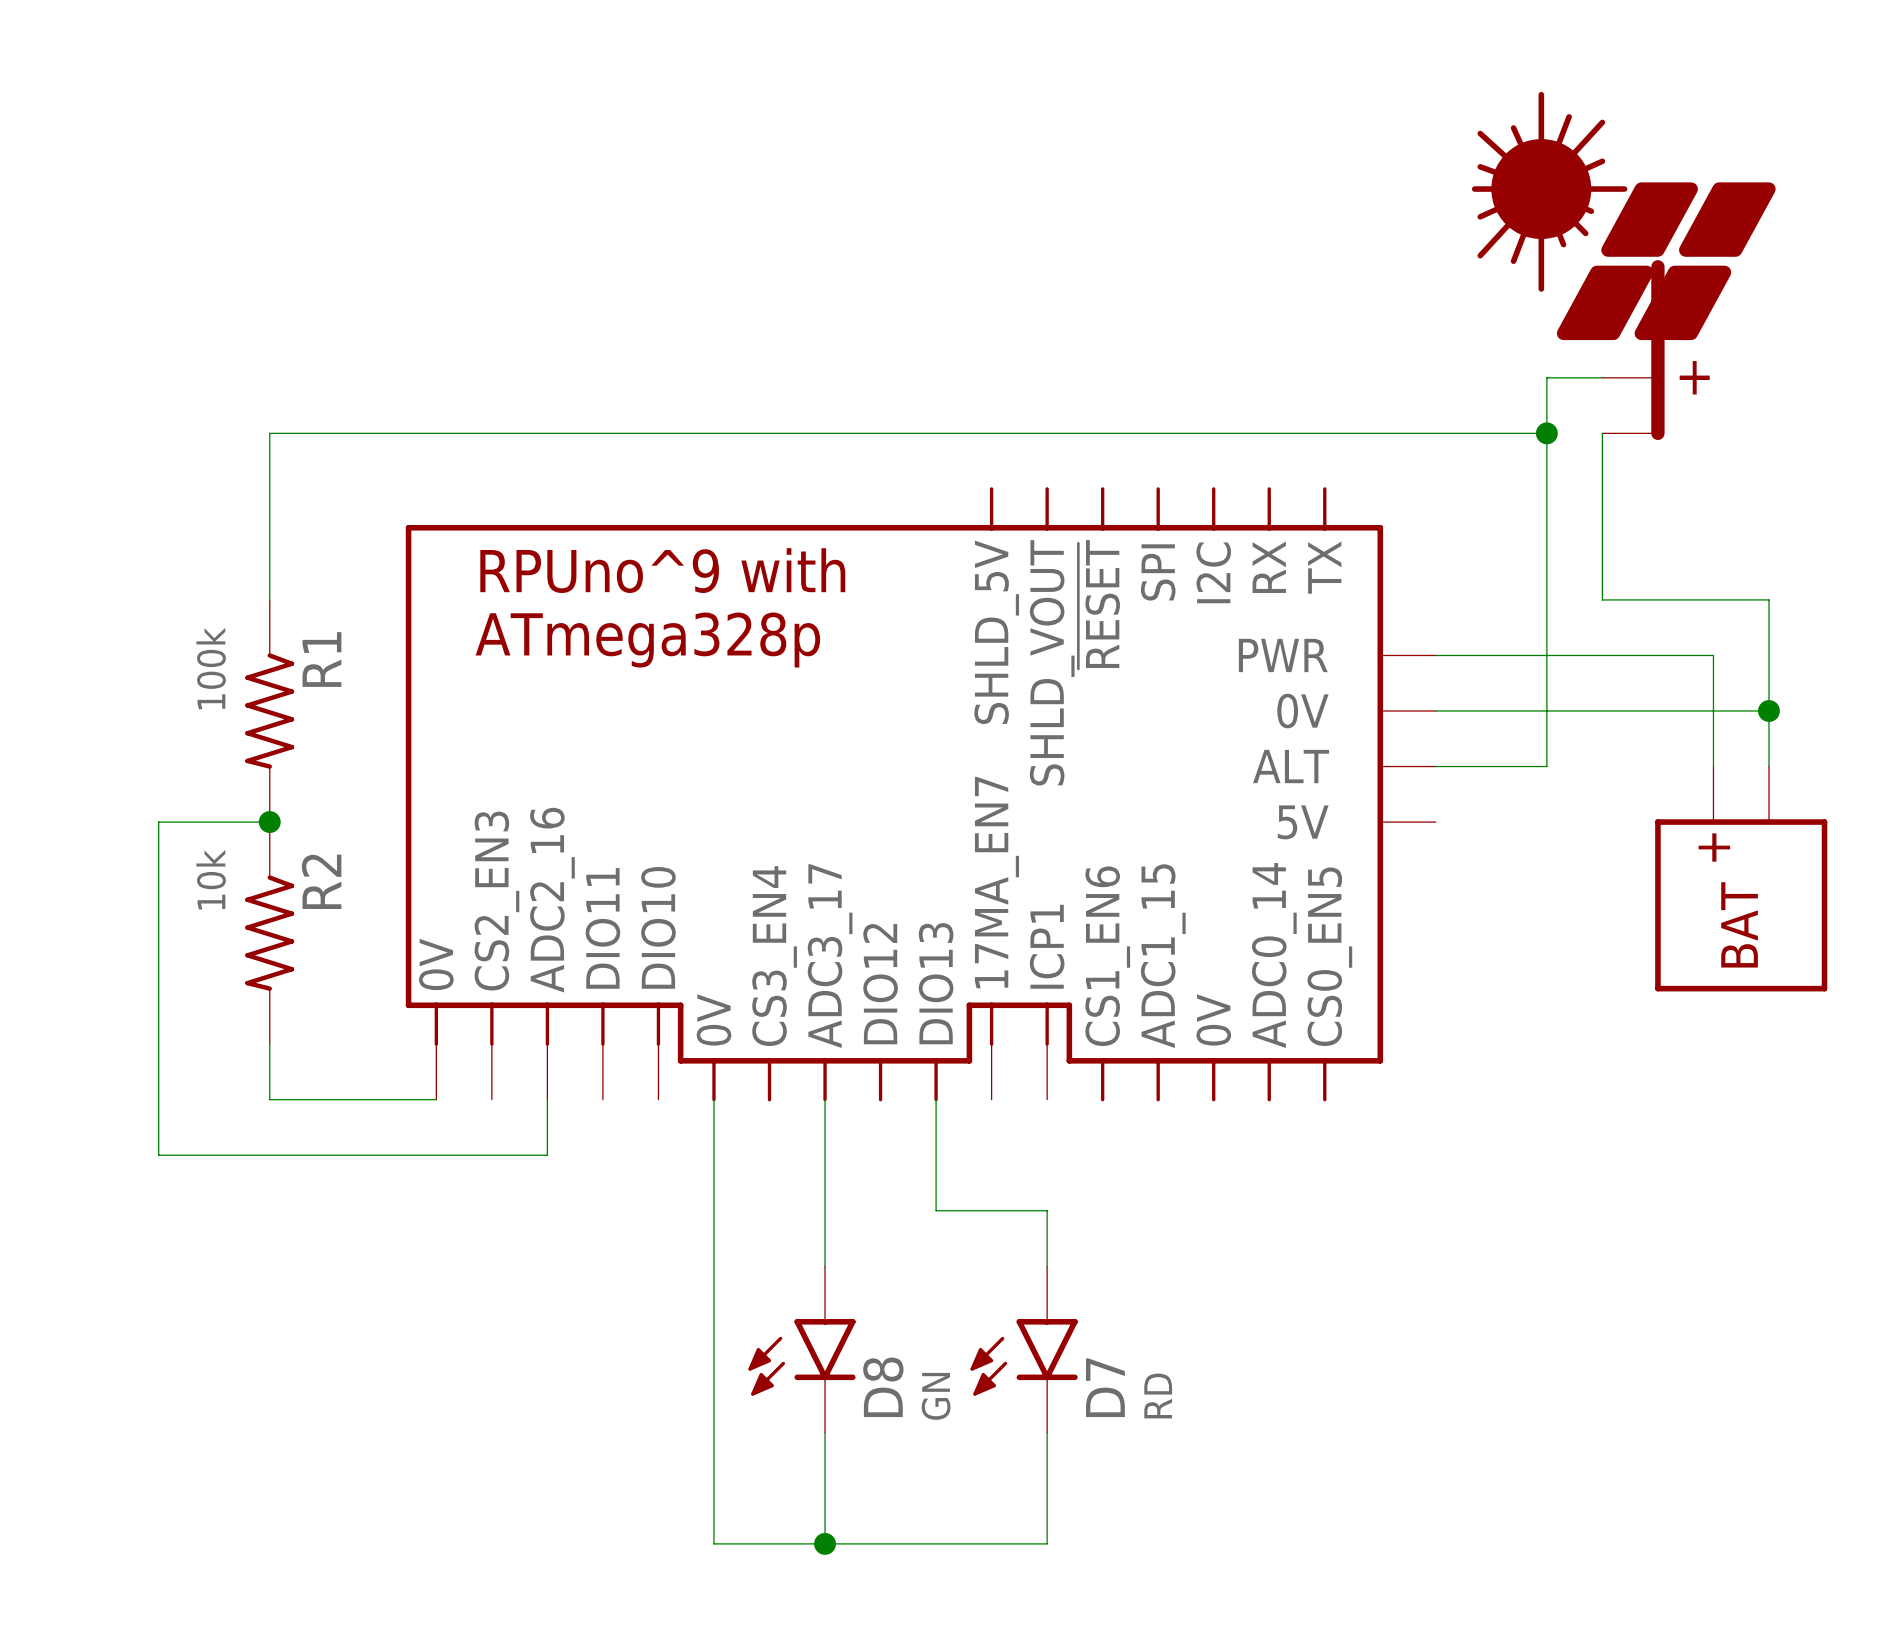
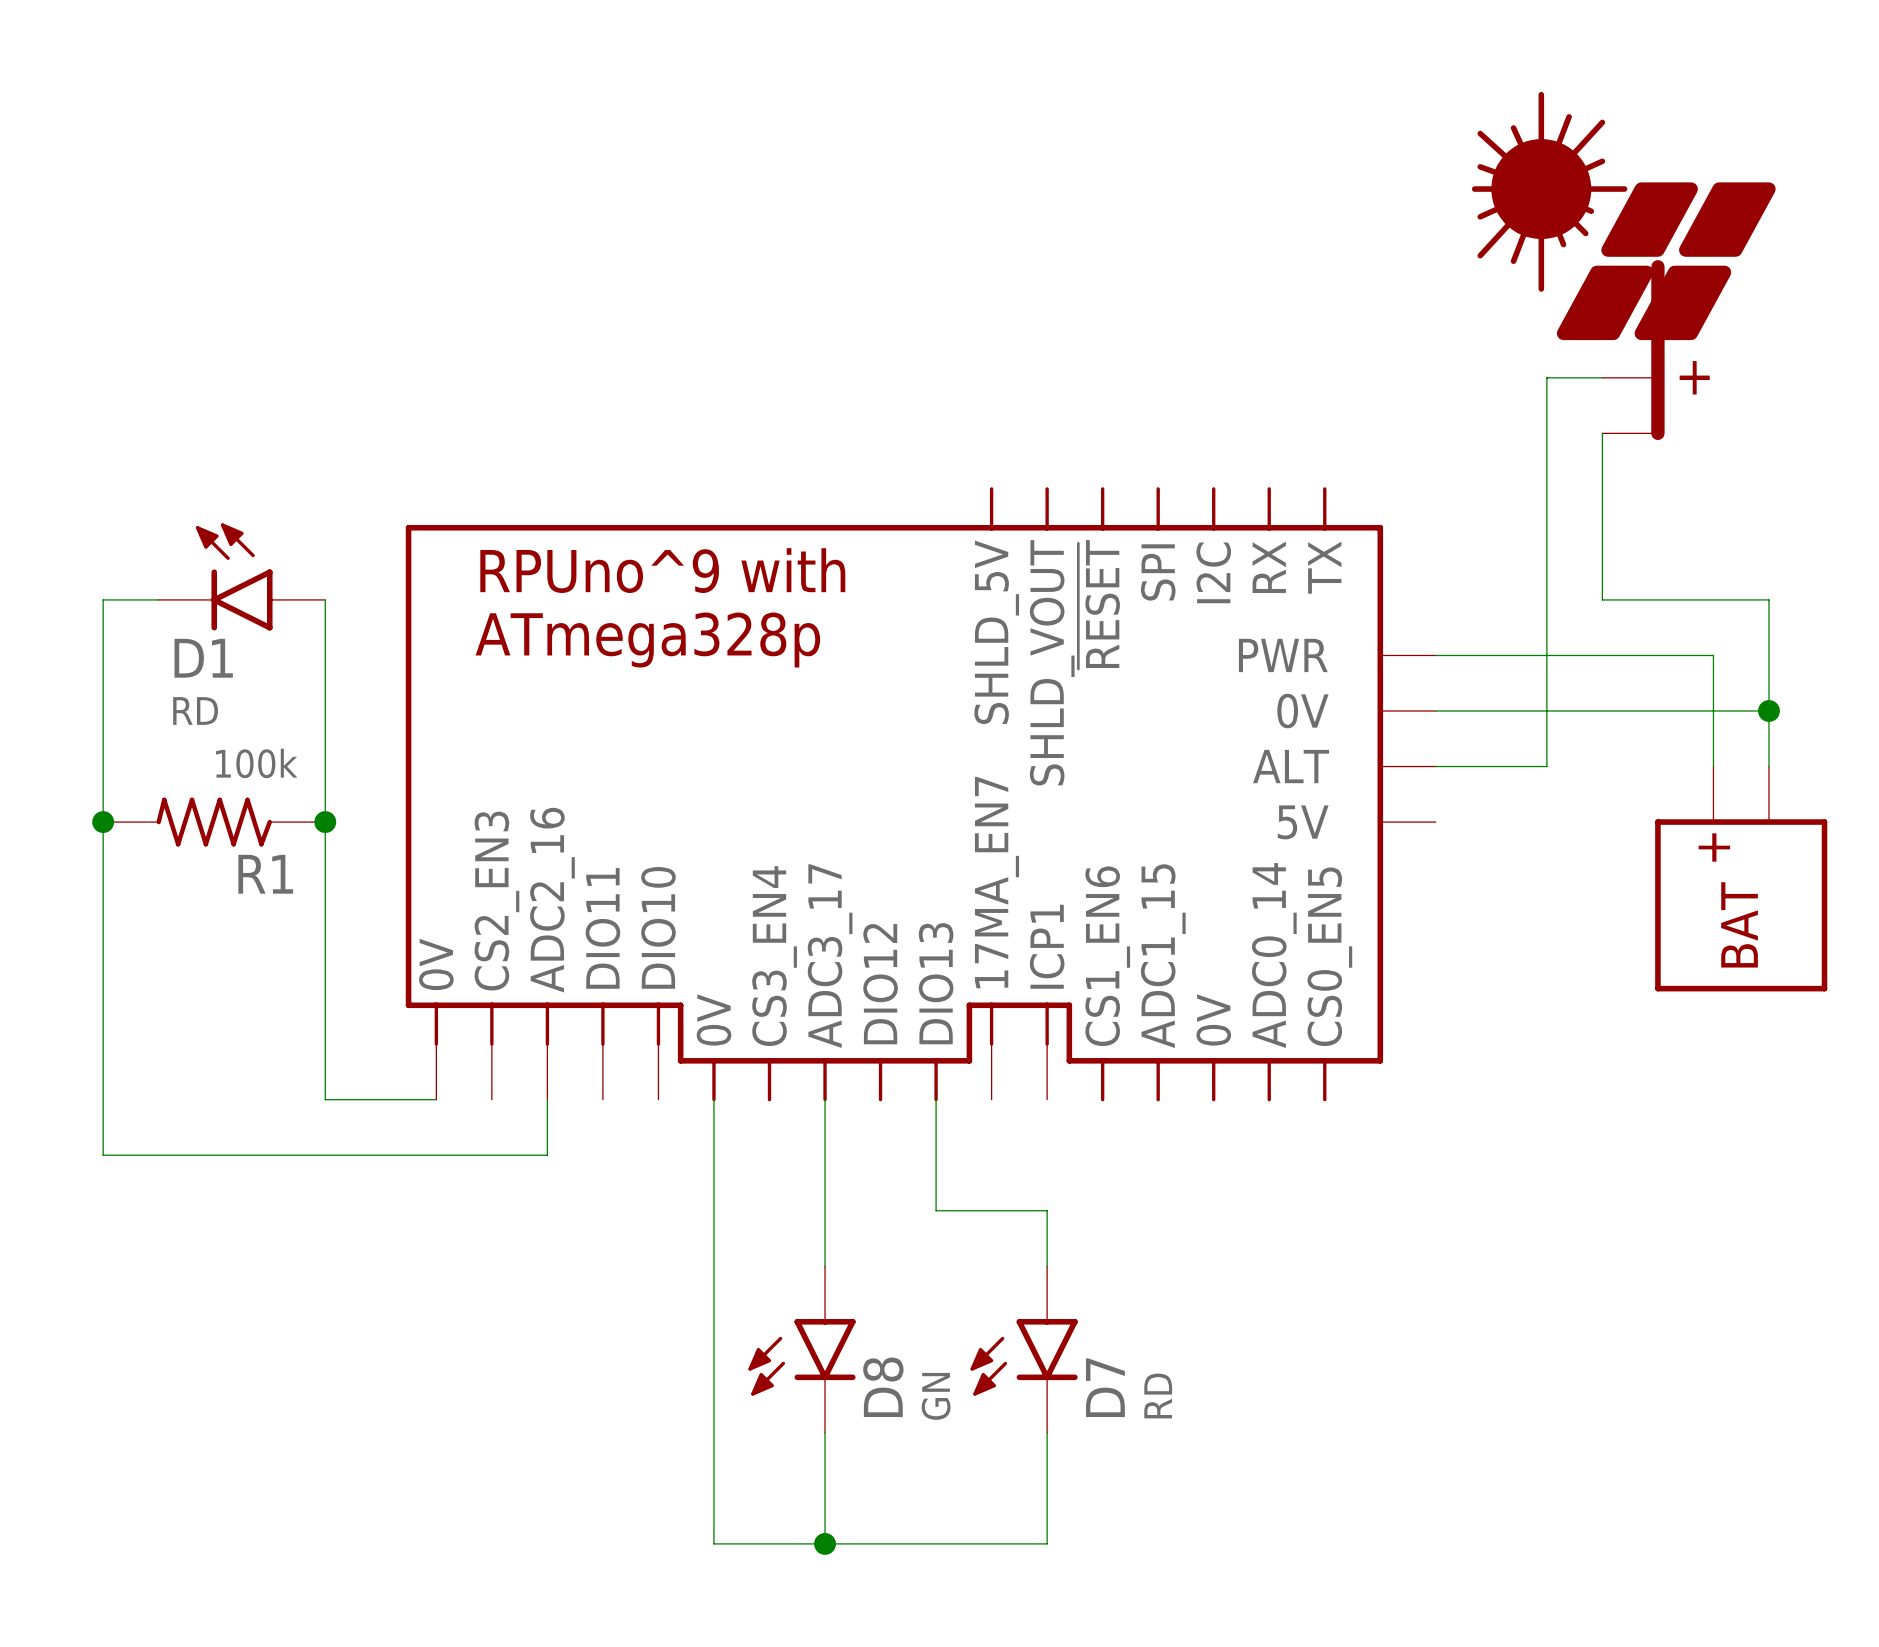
wire: (1546, 433) (269, 433) (269, 599) -> none
junction: (1546, 433) -> none
D1: none -> RD (241, 576)
R1 rotation: 0° (269, 711) -> 90° clockwise (214, 822)
junction: none -> (103, 822)
wire: (269, 822) (158, 822) (158, 1155) -> (158, 599) (103, 599) (103, 1155) (158, 1155)
junction position: (269, 822) -> (325, 822)
R2: 10k (269, 933) -> none
wire: (269, 1044) (269, 1099) (325, 1099) -> (325, 599) (325, 1099)

